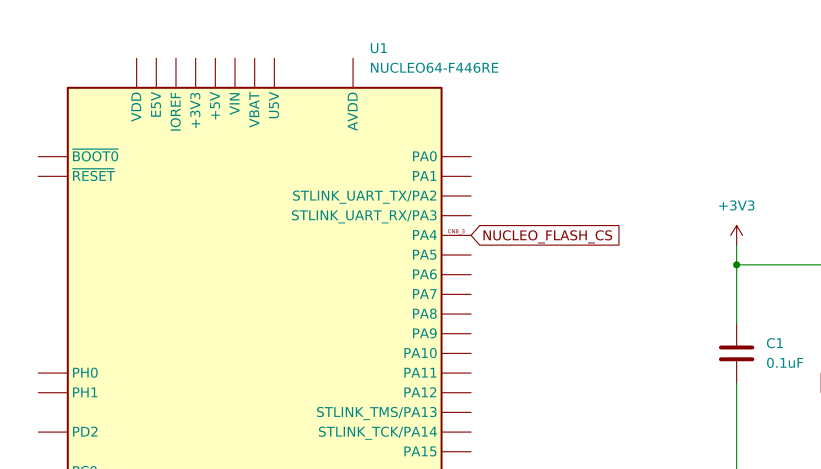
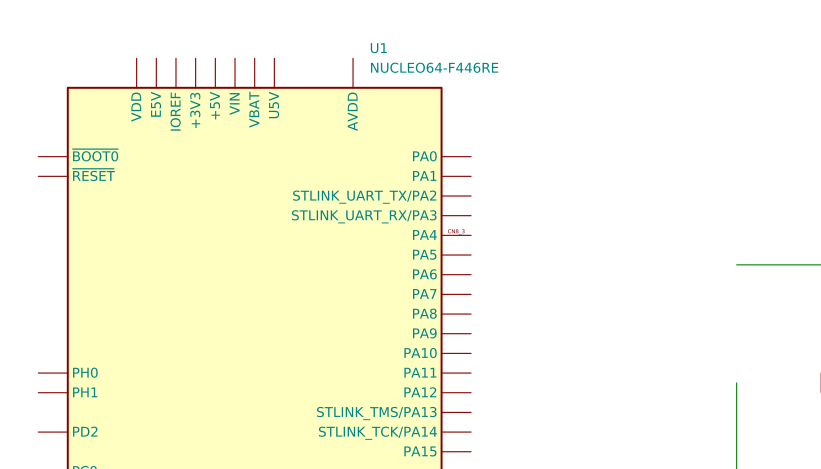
power symbol: +3V3 (736, 235) -> none
global label: NUCLEO_FLASH_CS (547, 236) -> none
wire: (736, 245) (736, 323) -> none
junction: (736, 264) -> none
C1: 0.1uF (736, 353) -> none

